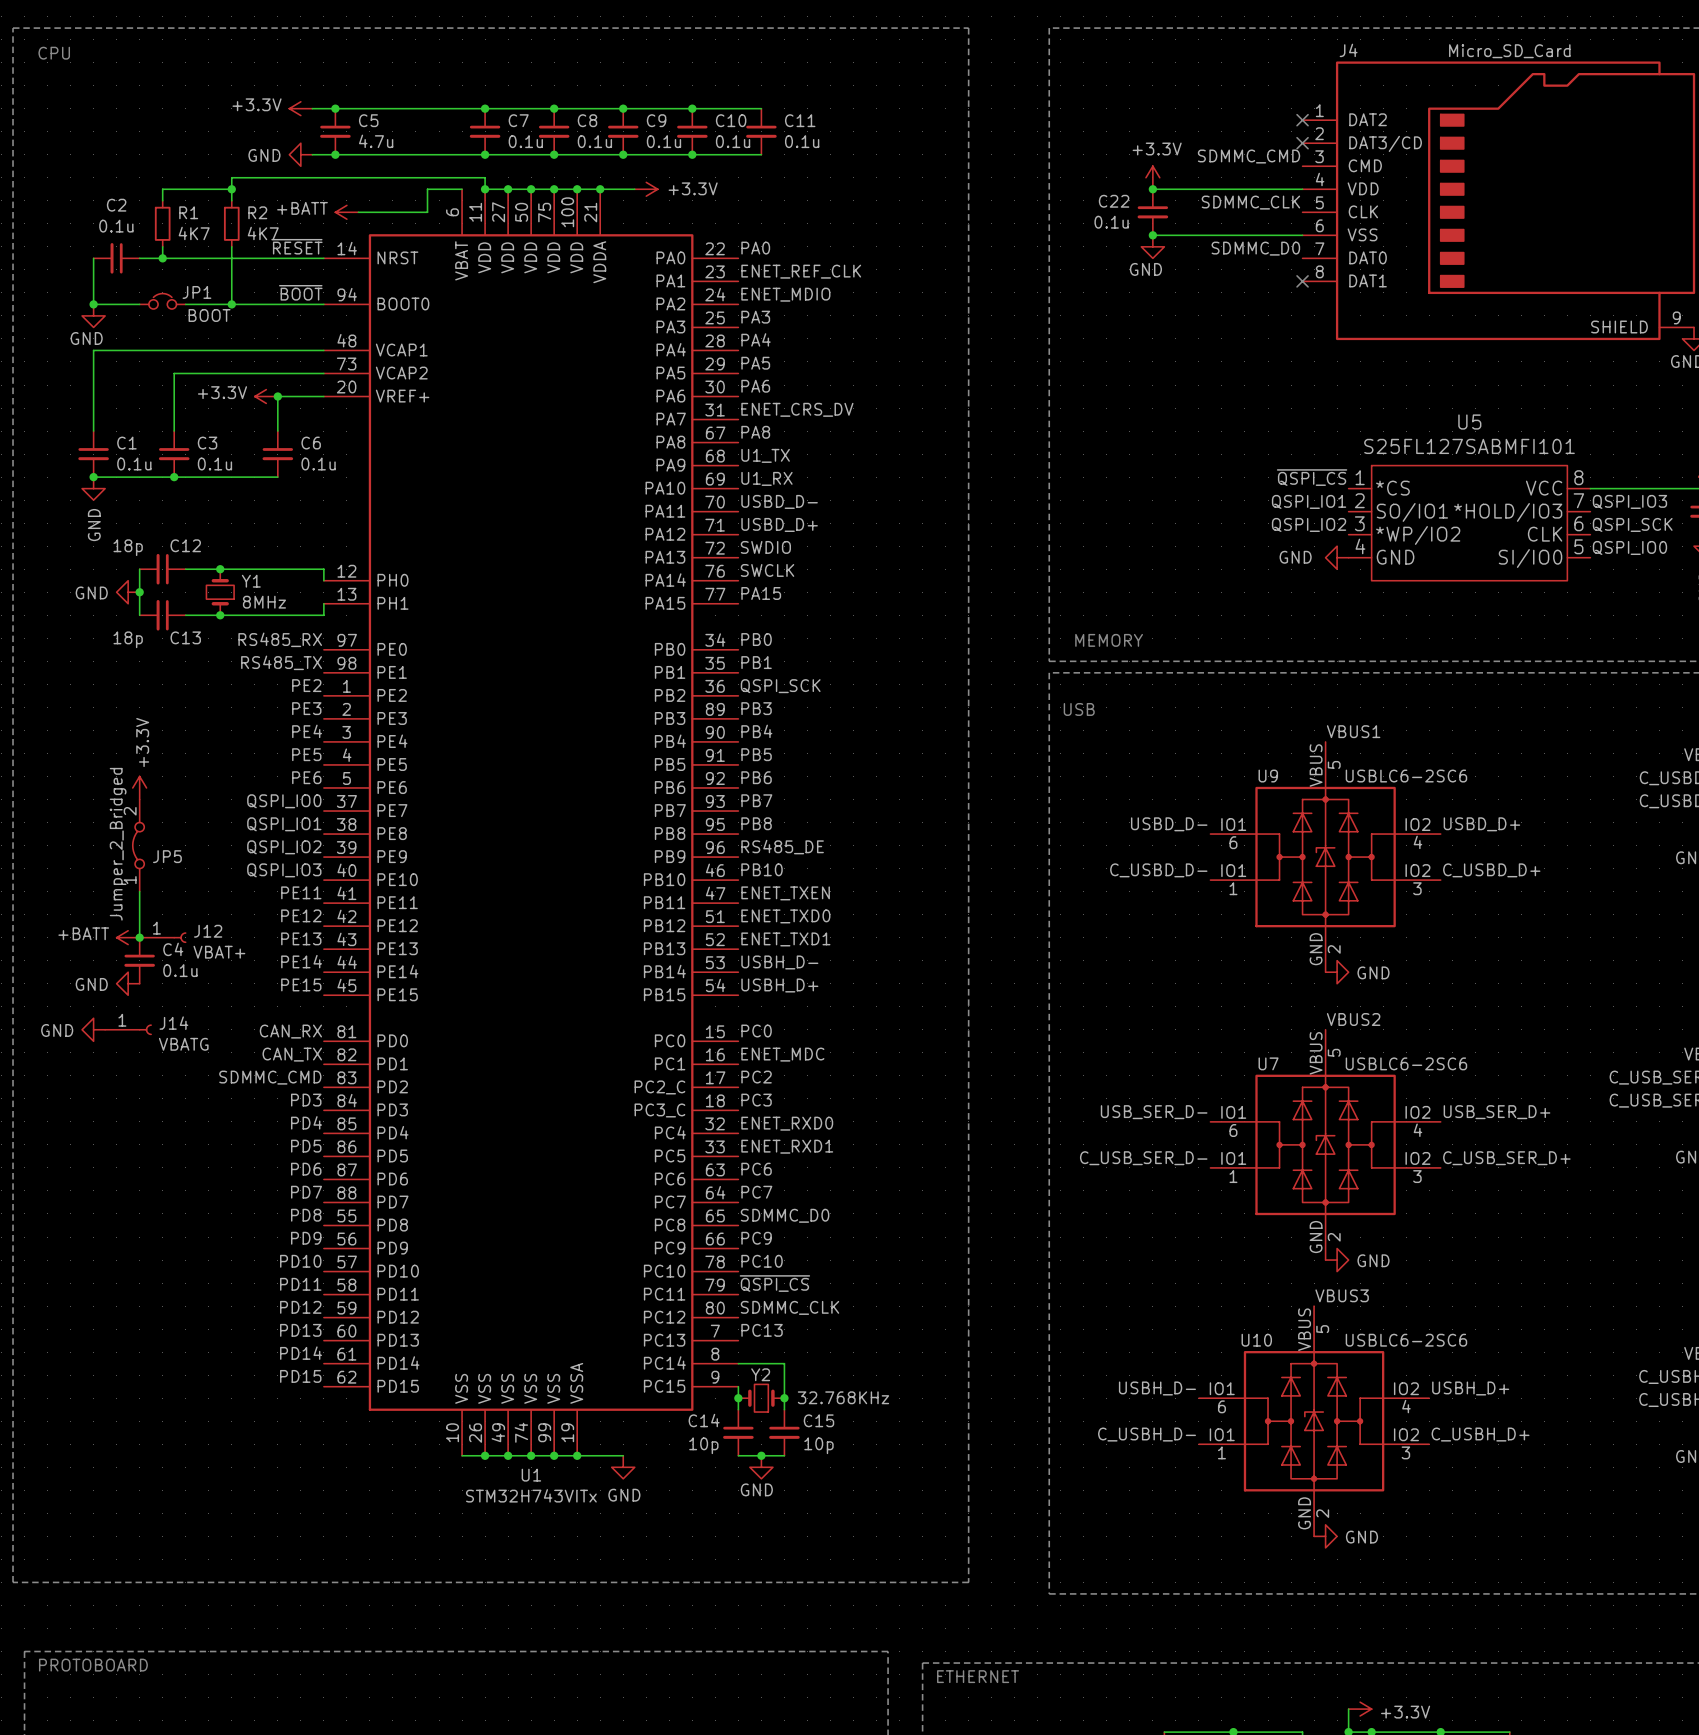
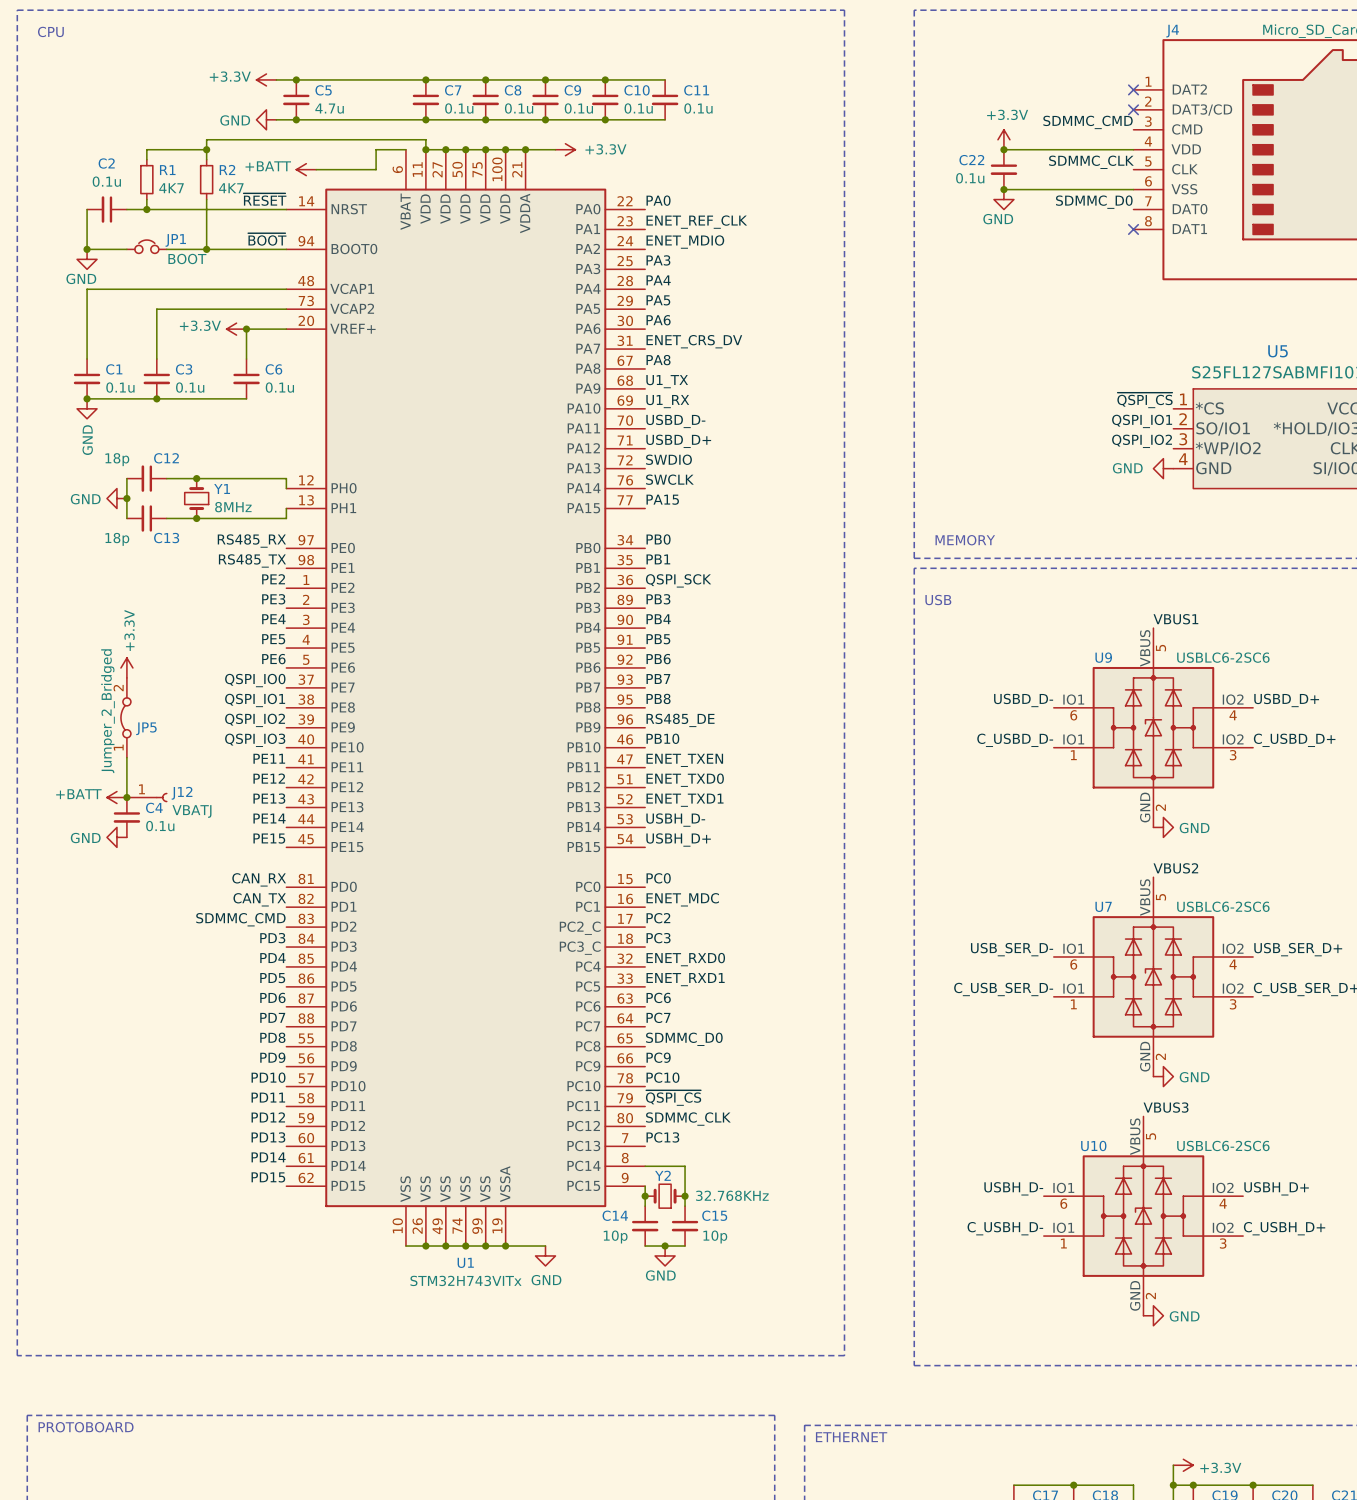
J12 value: VBAT+ (219, 952) -> VBATJ (191, 811)
power symbol: GND (93, 1029) -> none
J14: VBATG (128, 1029) -> none

